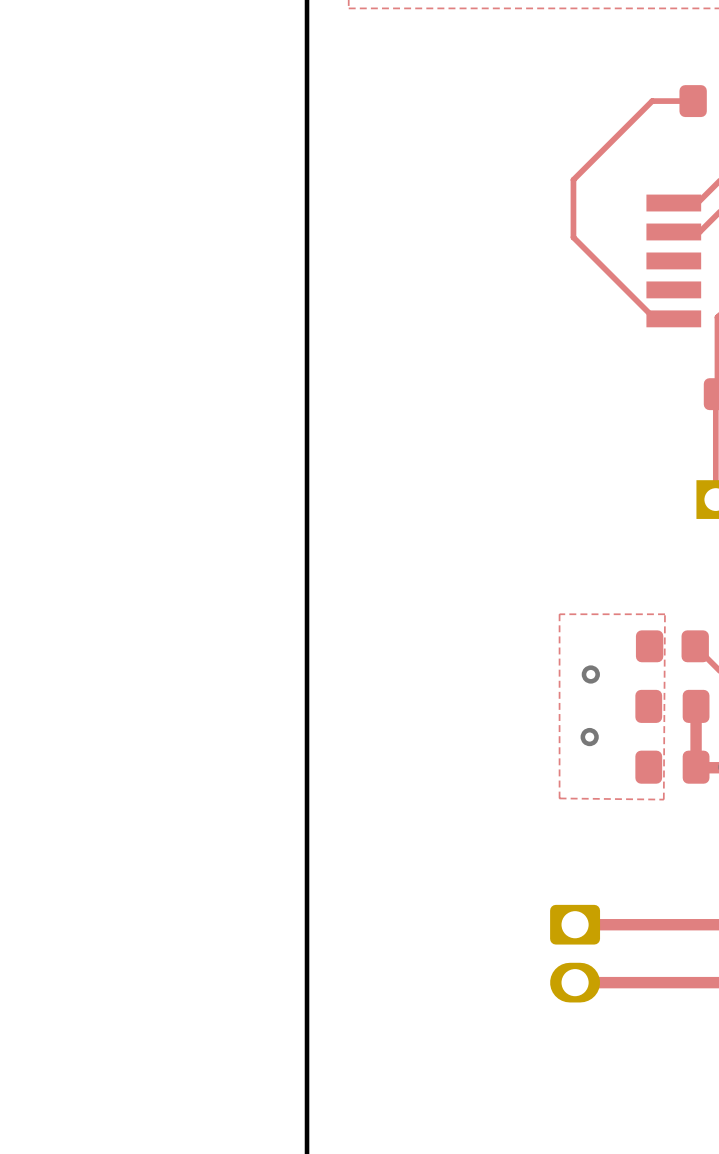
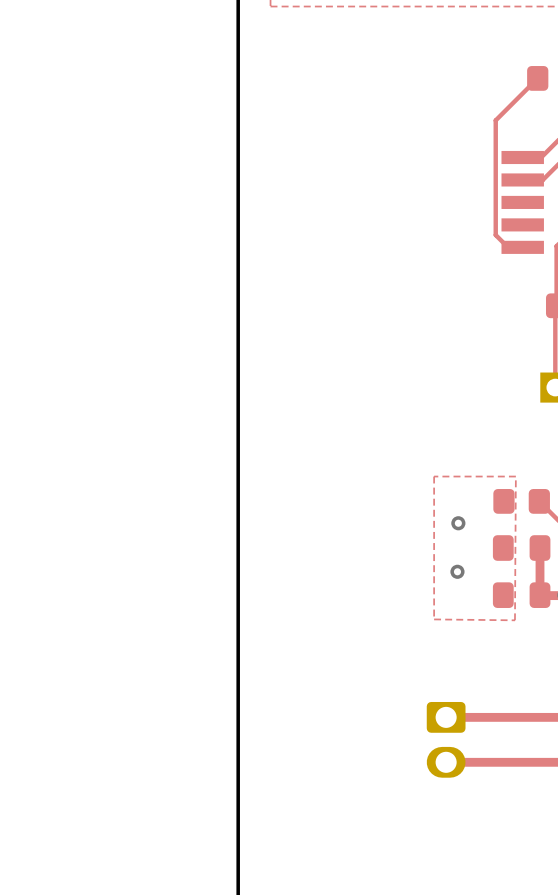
top track: (693, 101) (652, 101) (573, 179) (573, 237) (639, 303) -> (537, 78) (495, 120) (495, 235)

